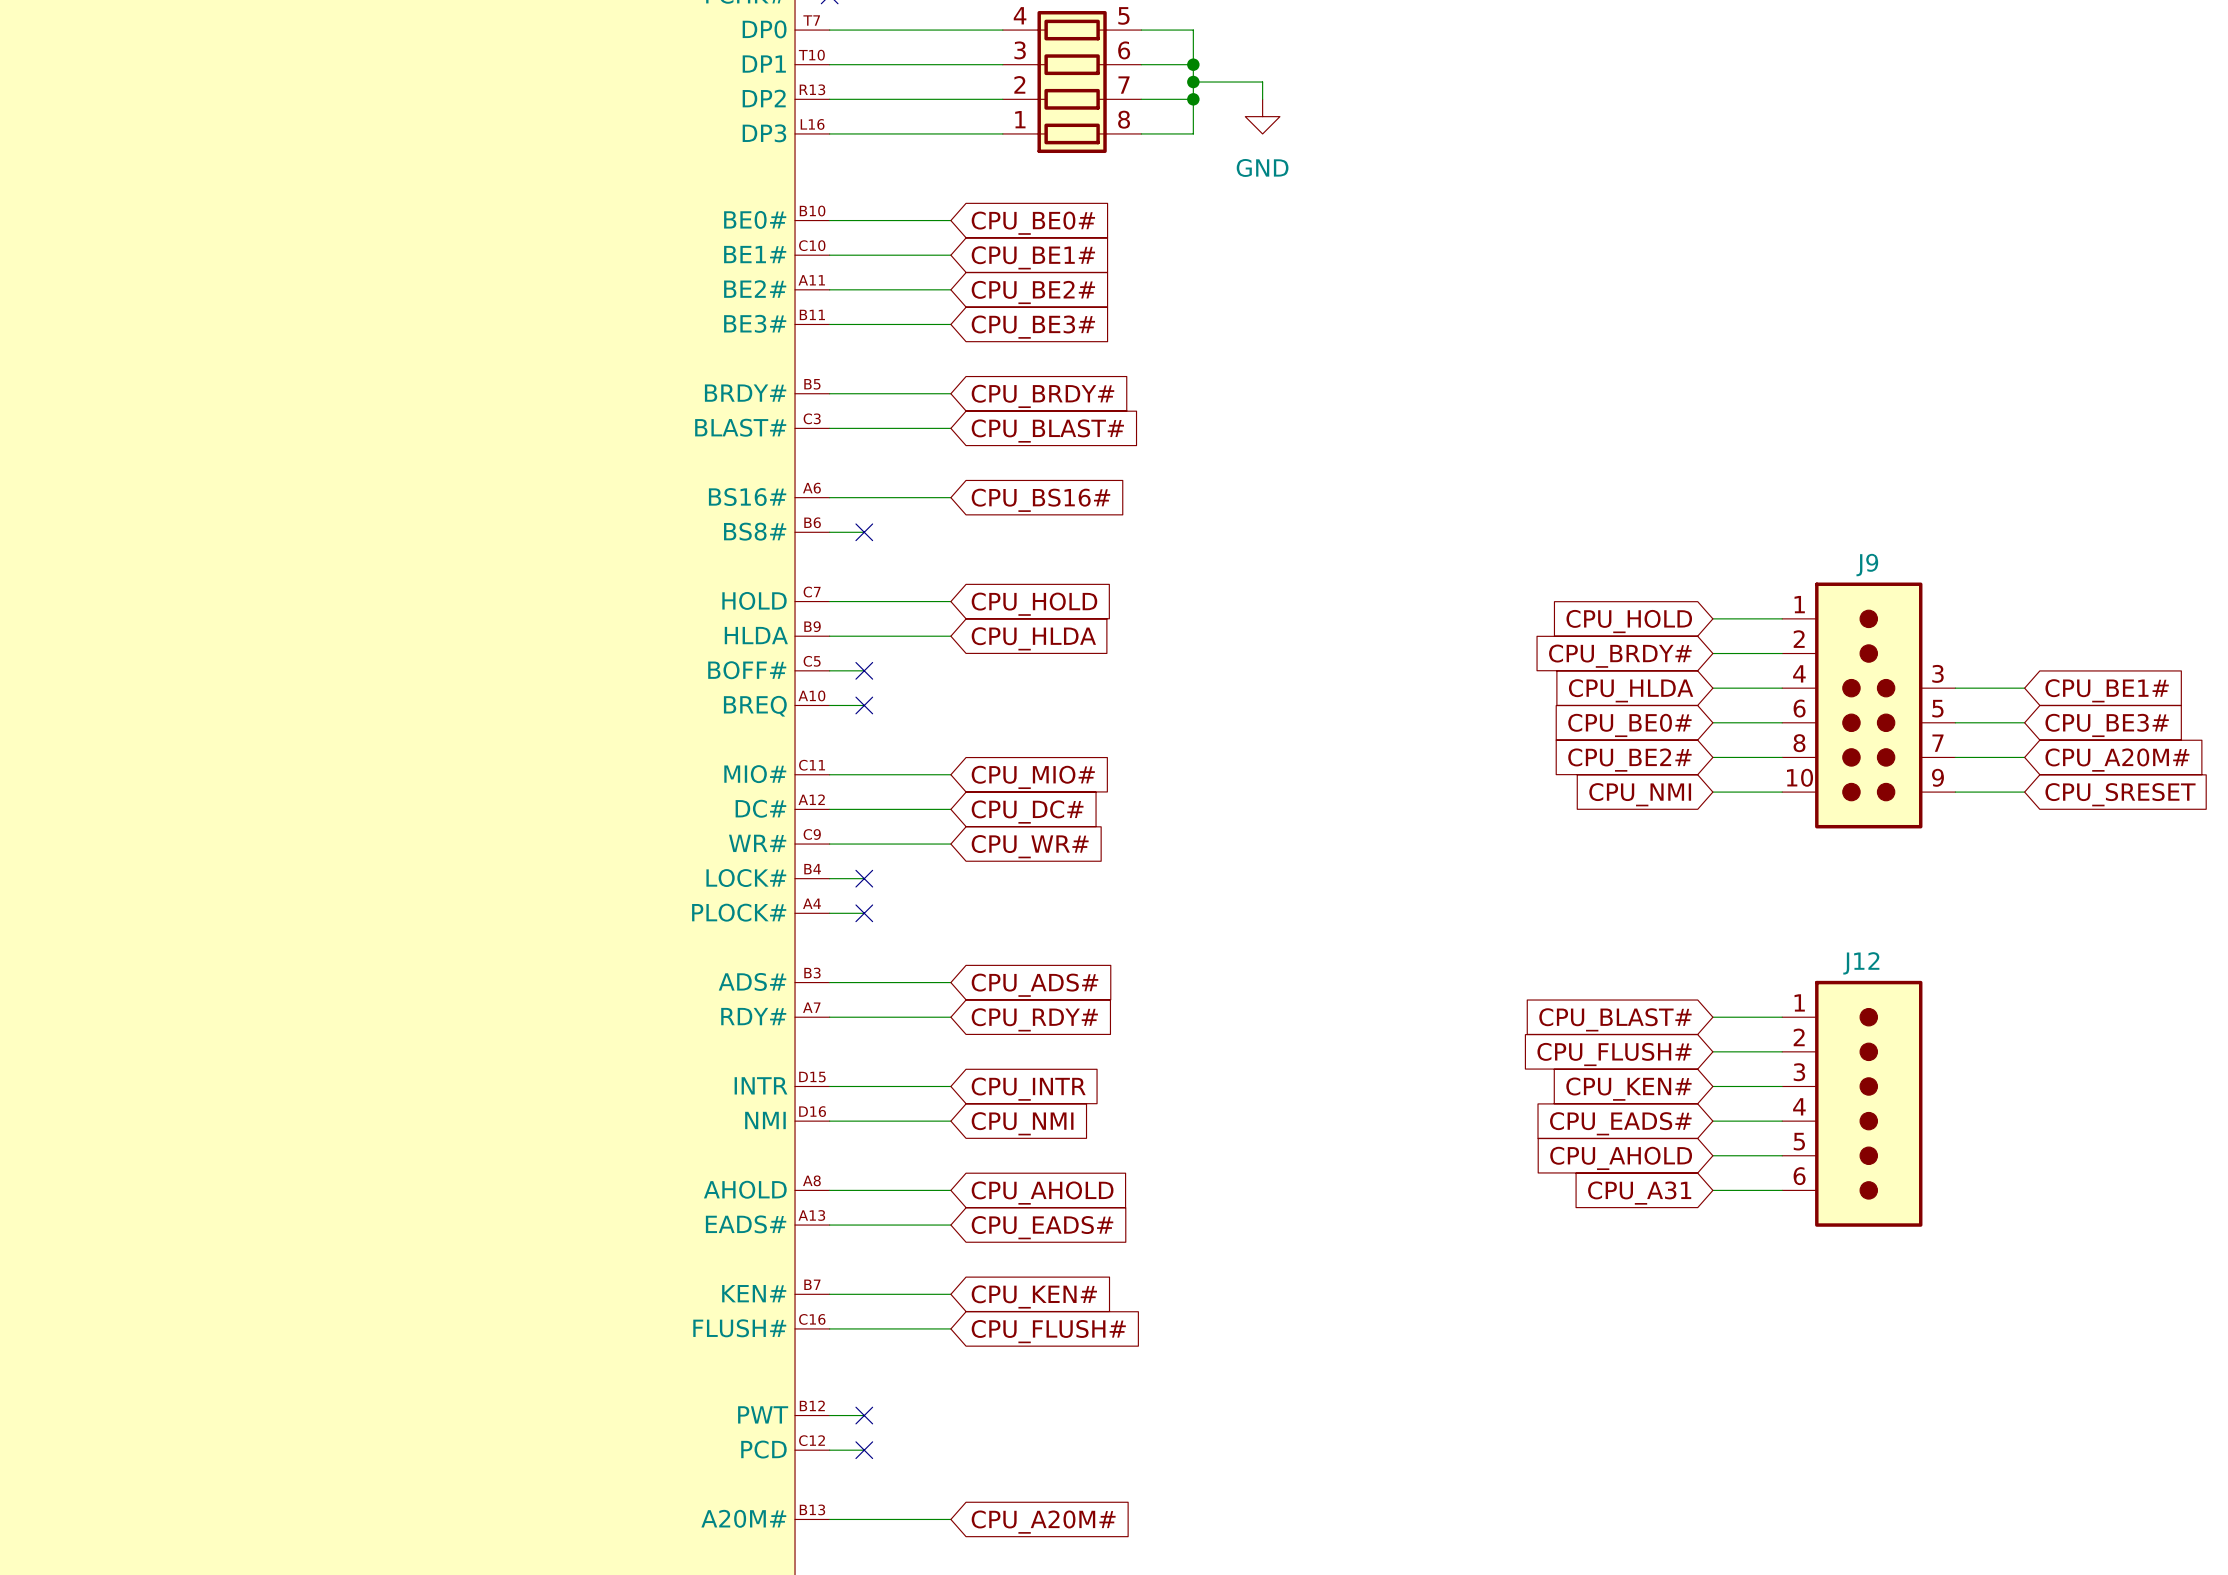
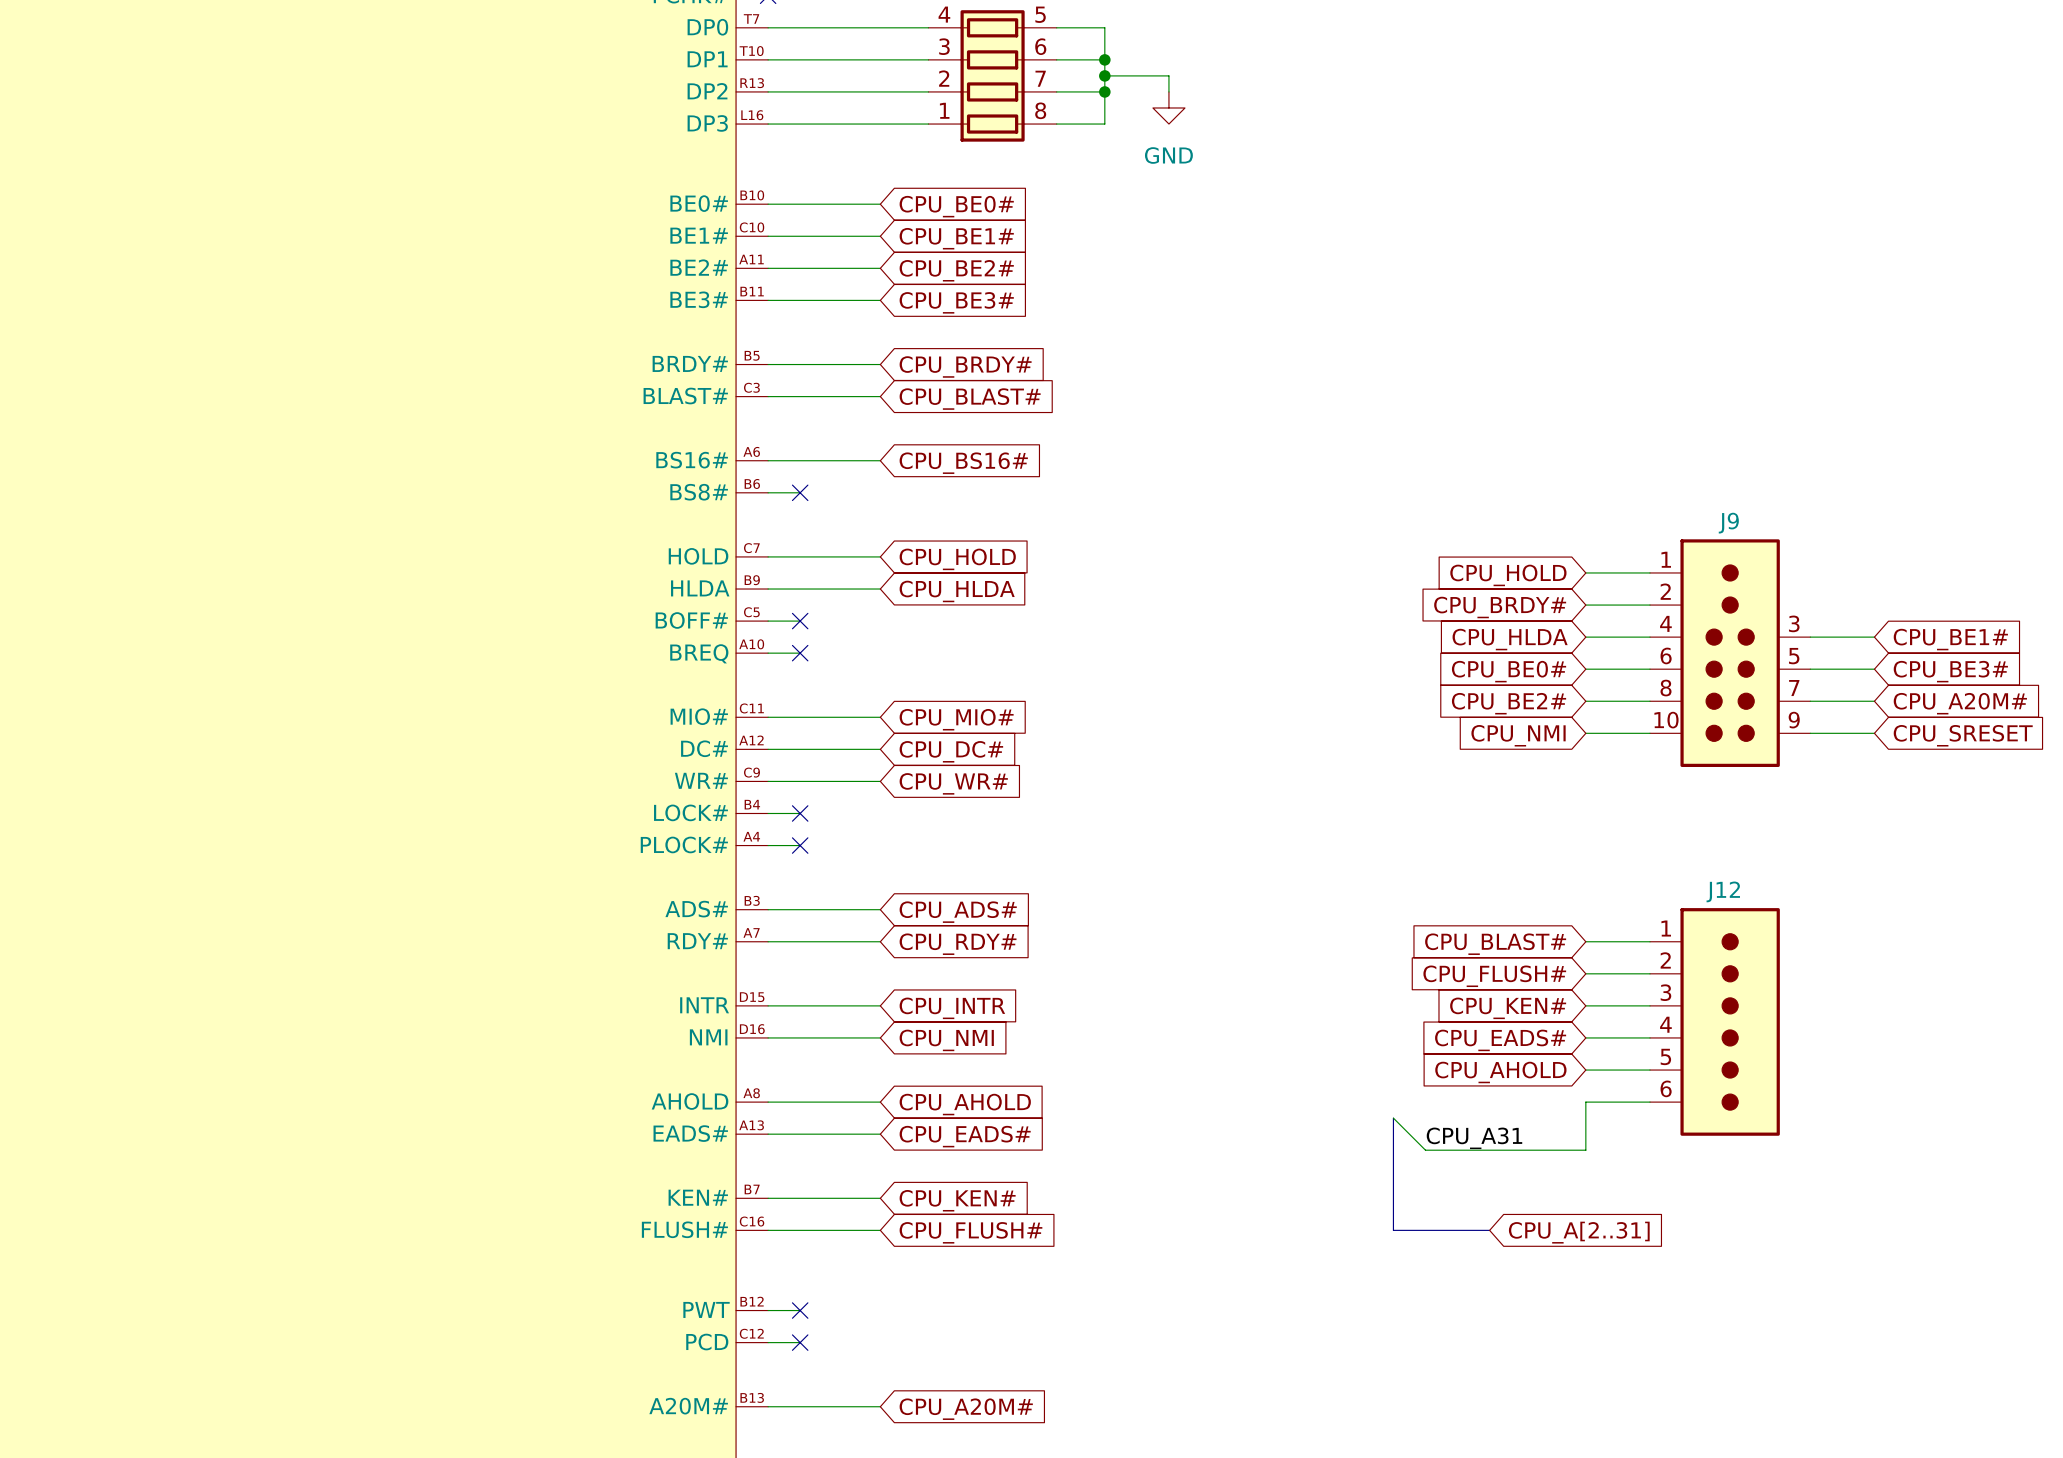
wire: none -> (1585, 1102) (1585, 1150) (1425, 1150) (1393, 1118)
global label: CPU_A31 (1639, 1193) -> none
bus: none -> (1393, 1118) (1393, 1230) (1489, 1230)
label: none -> CPU_A31 (1474, 1138)
global label: none -> CPU_A[2..31] (1579, 1232)

